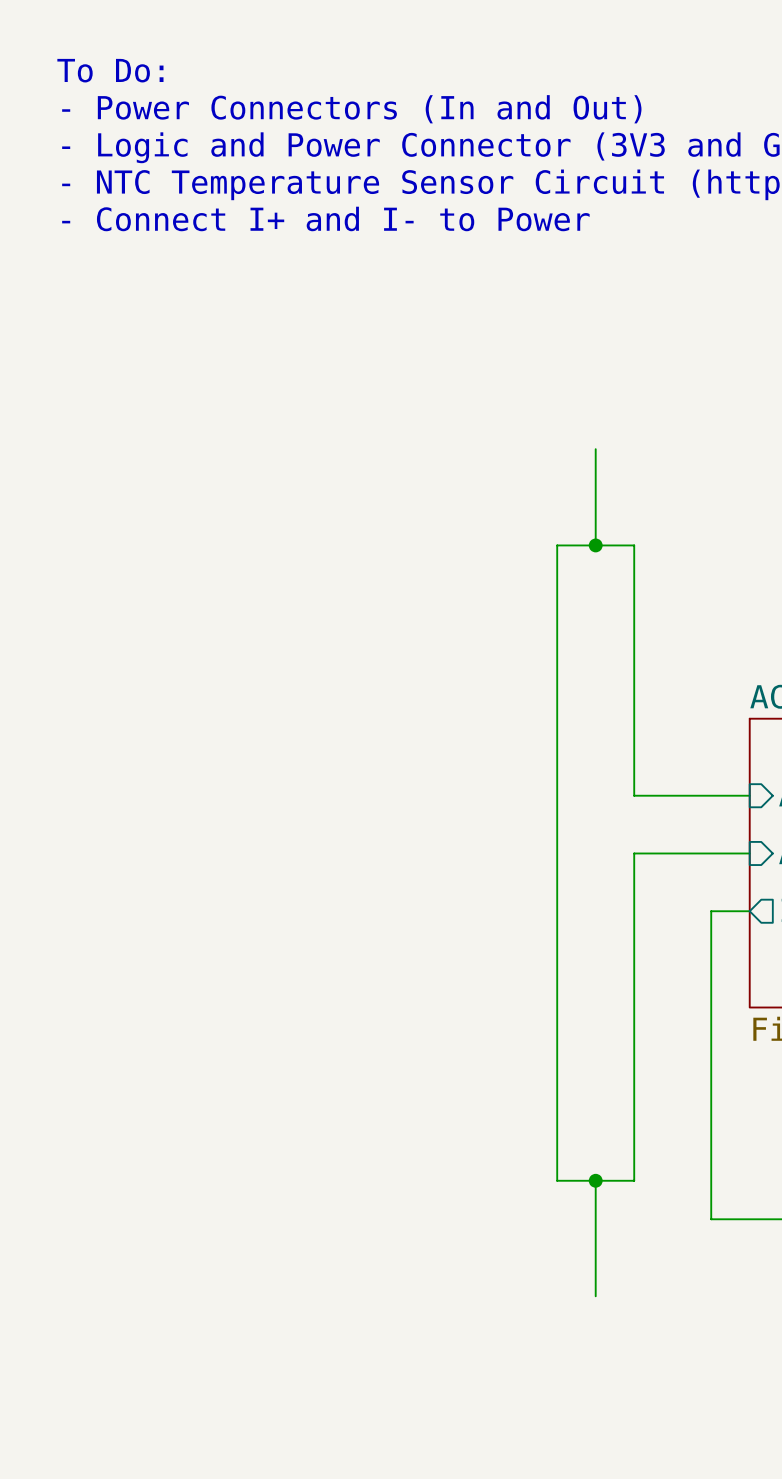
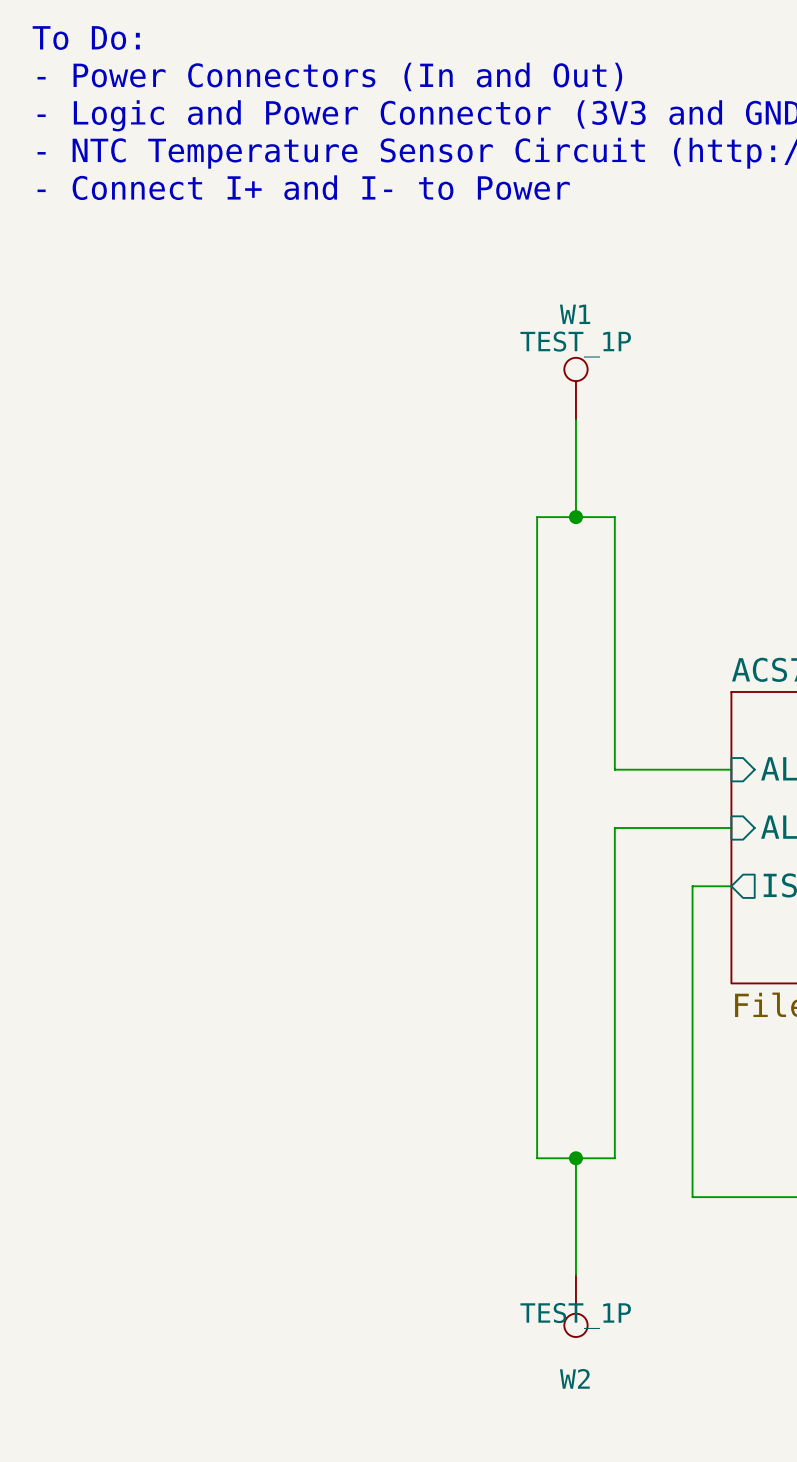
W1: none -> TEST_1P (575, 388)
W2: none -> TEST_1P (575, 1305)

